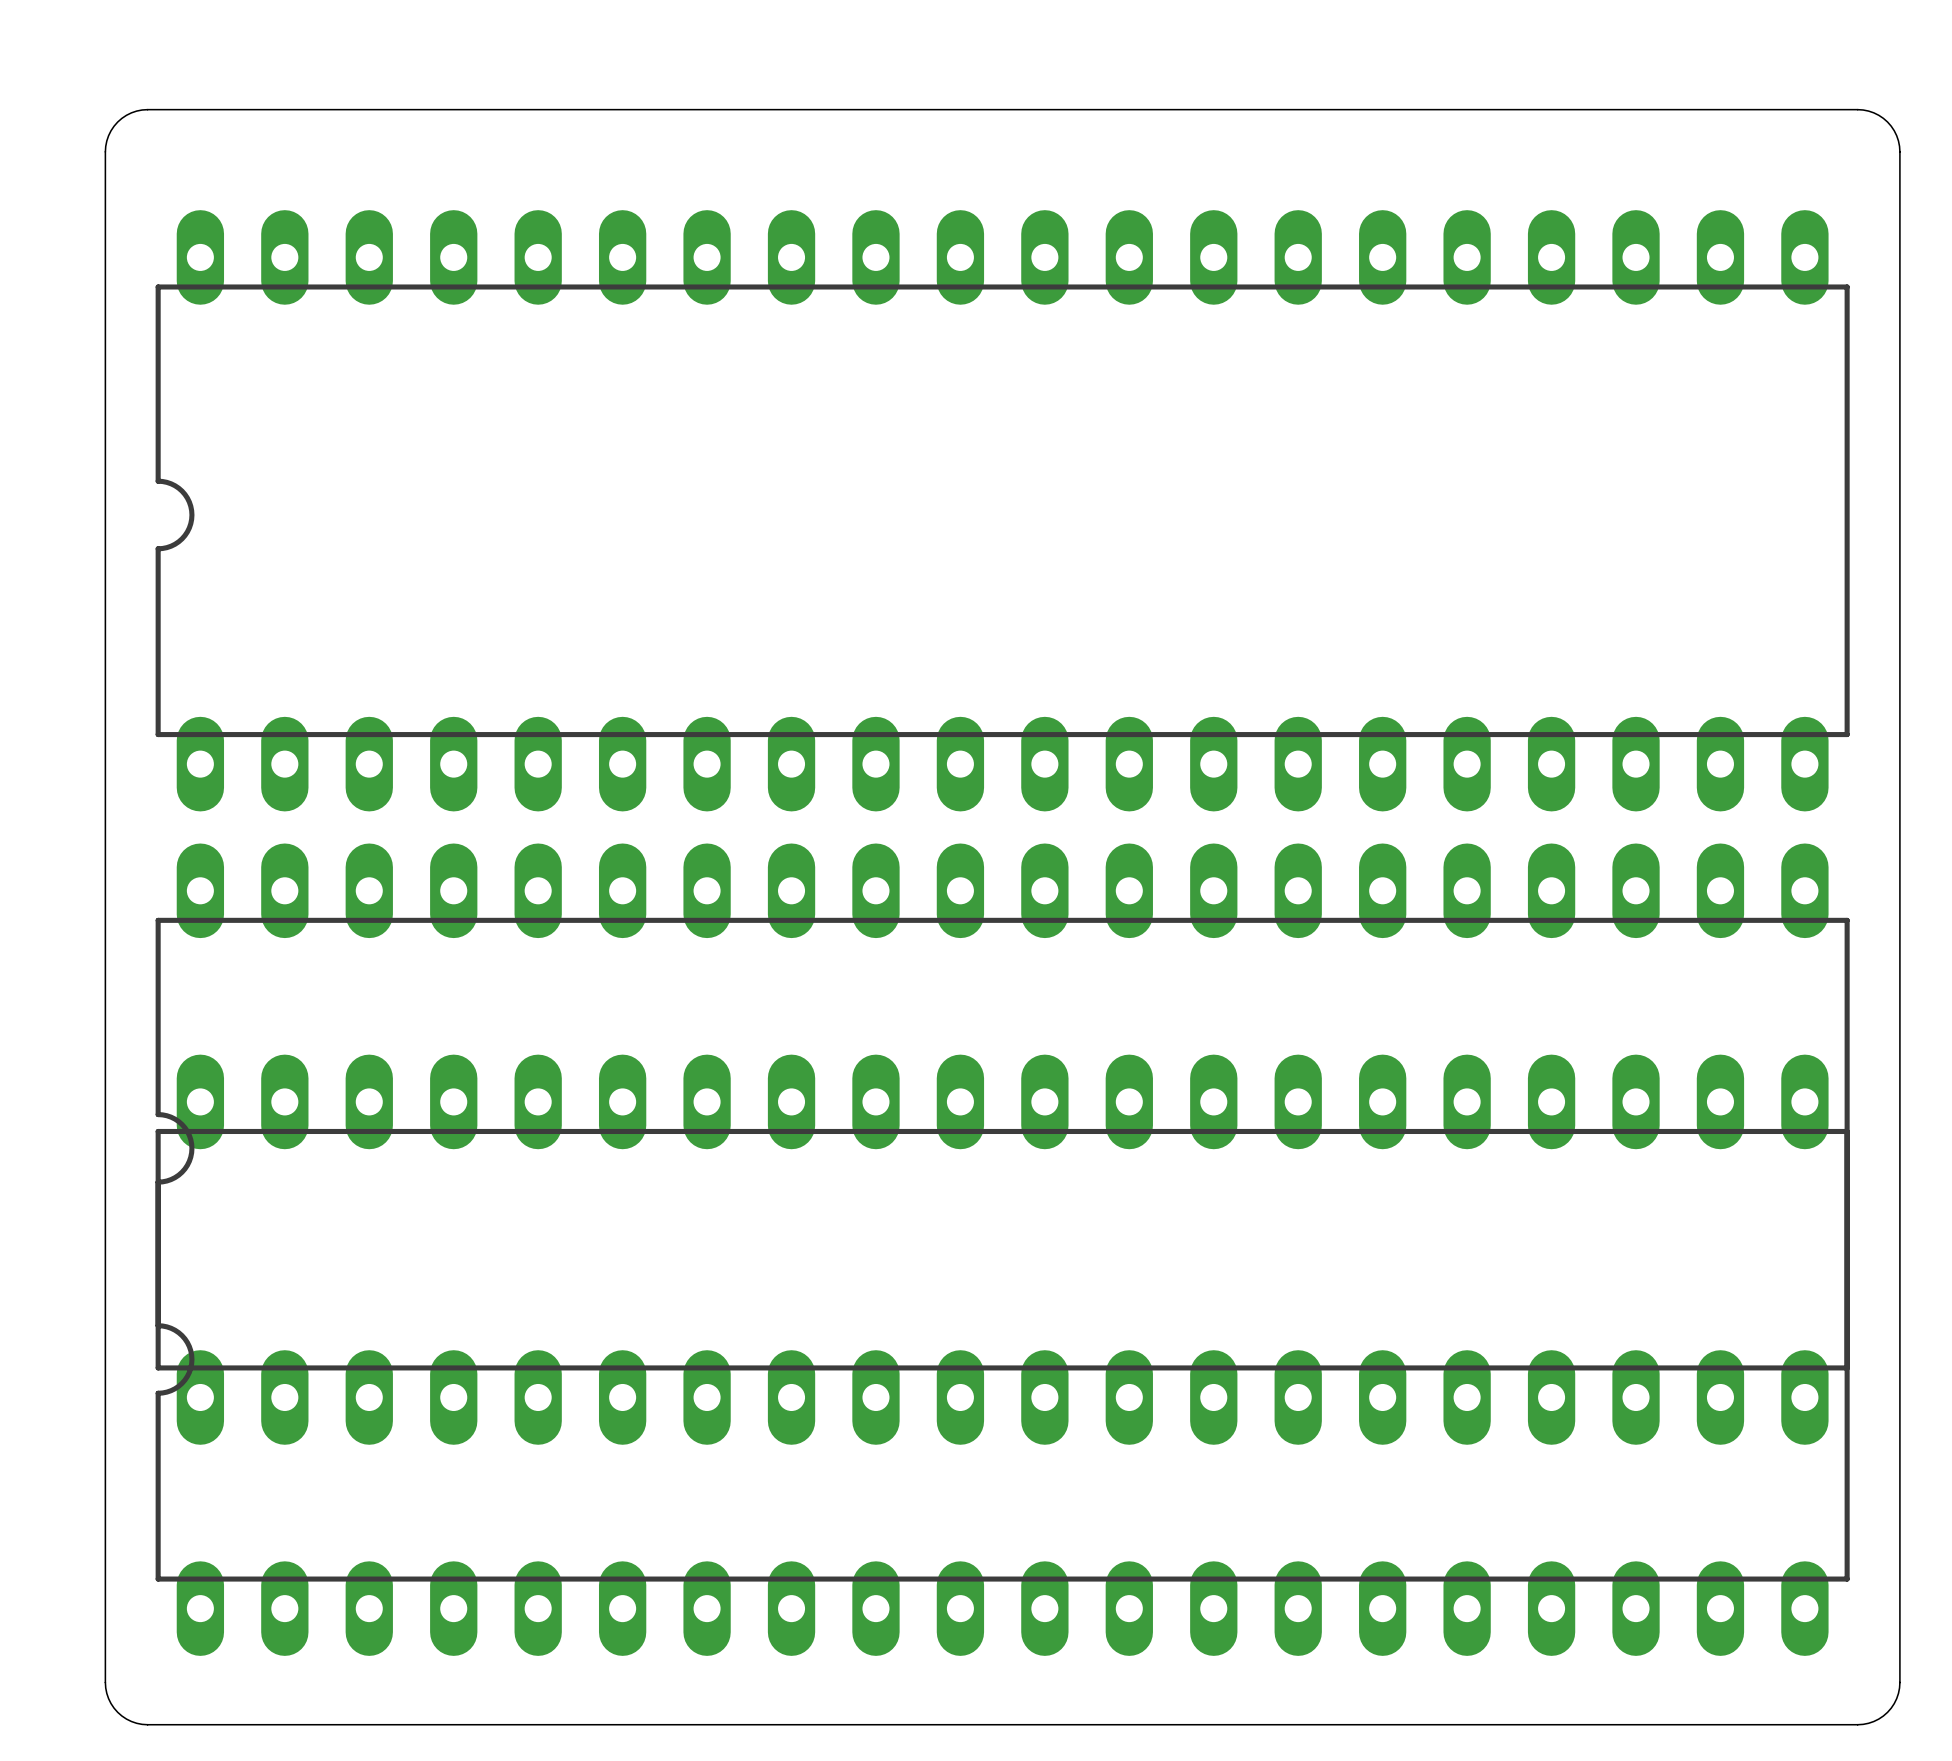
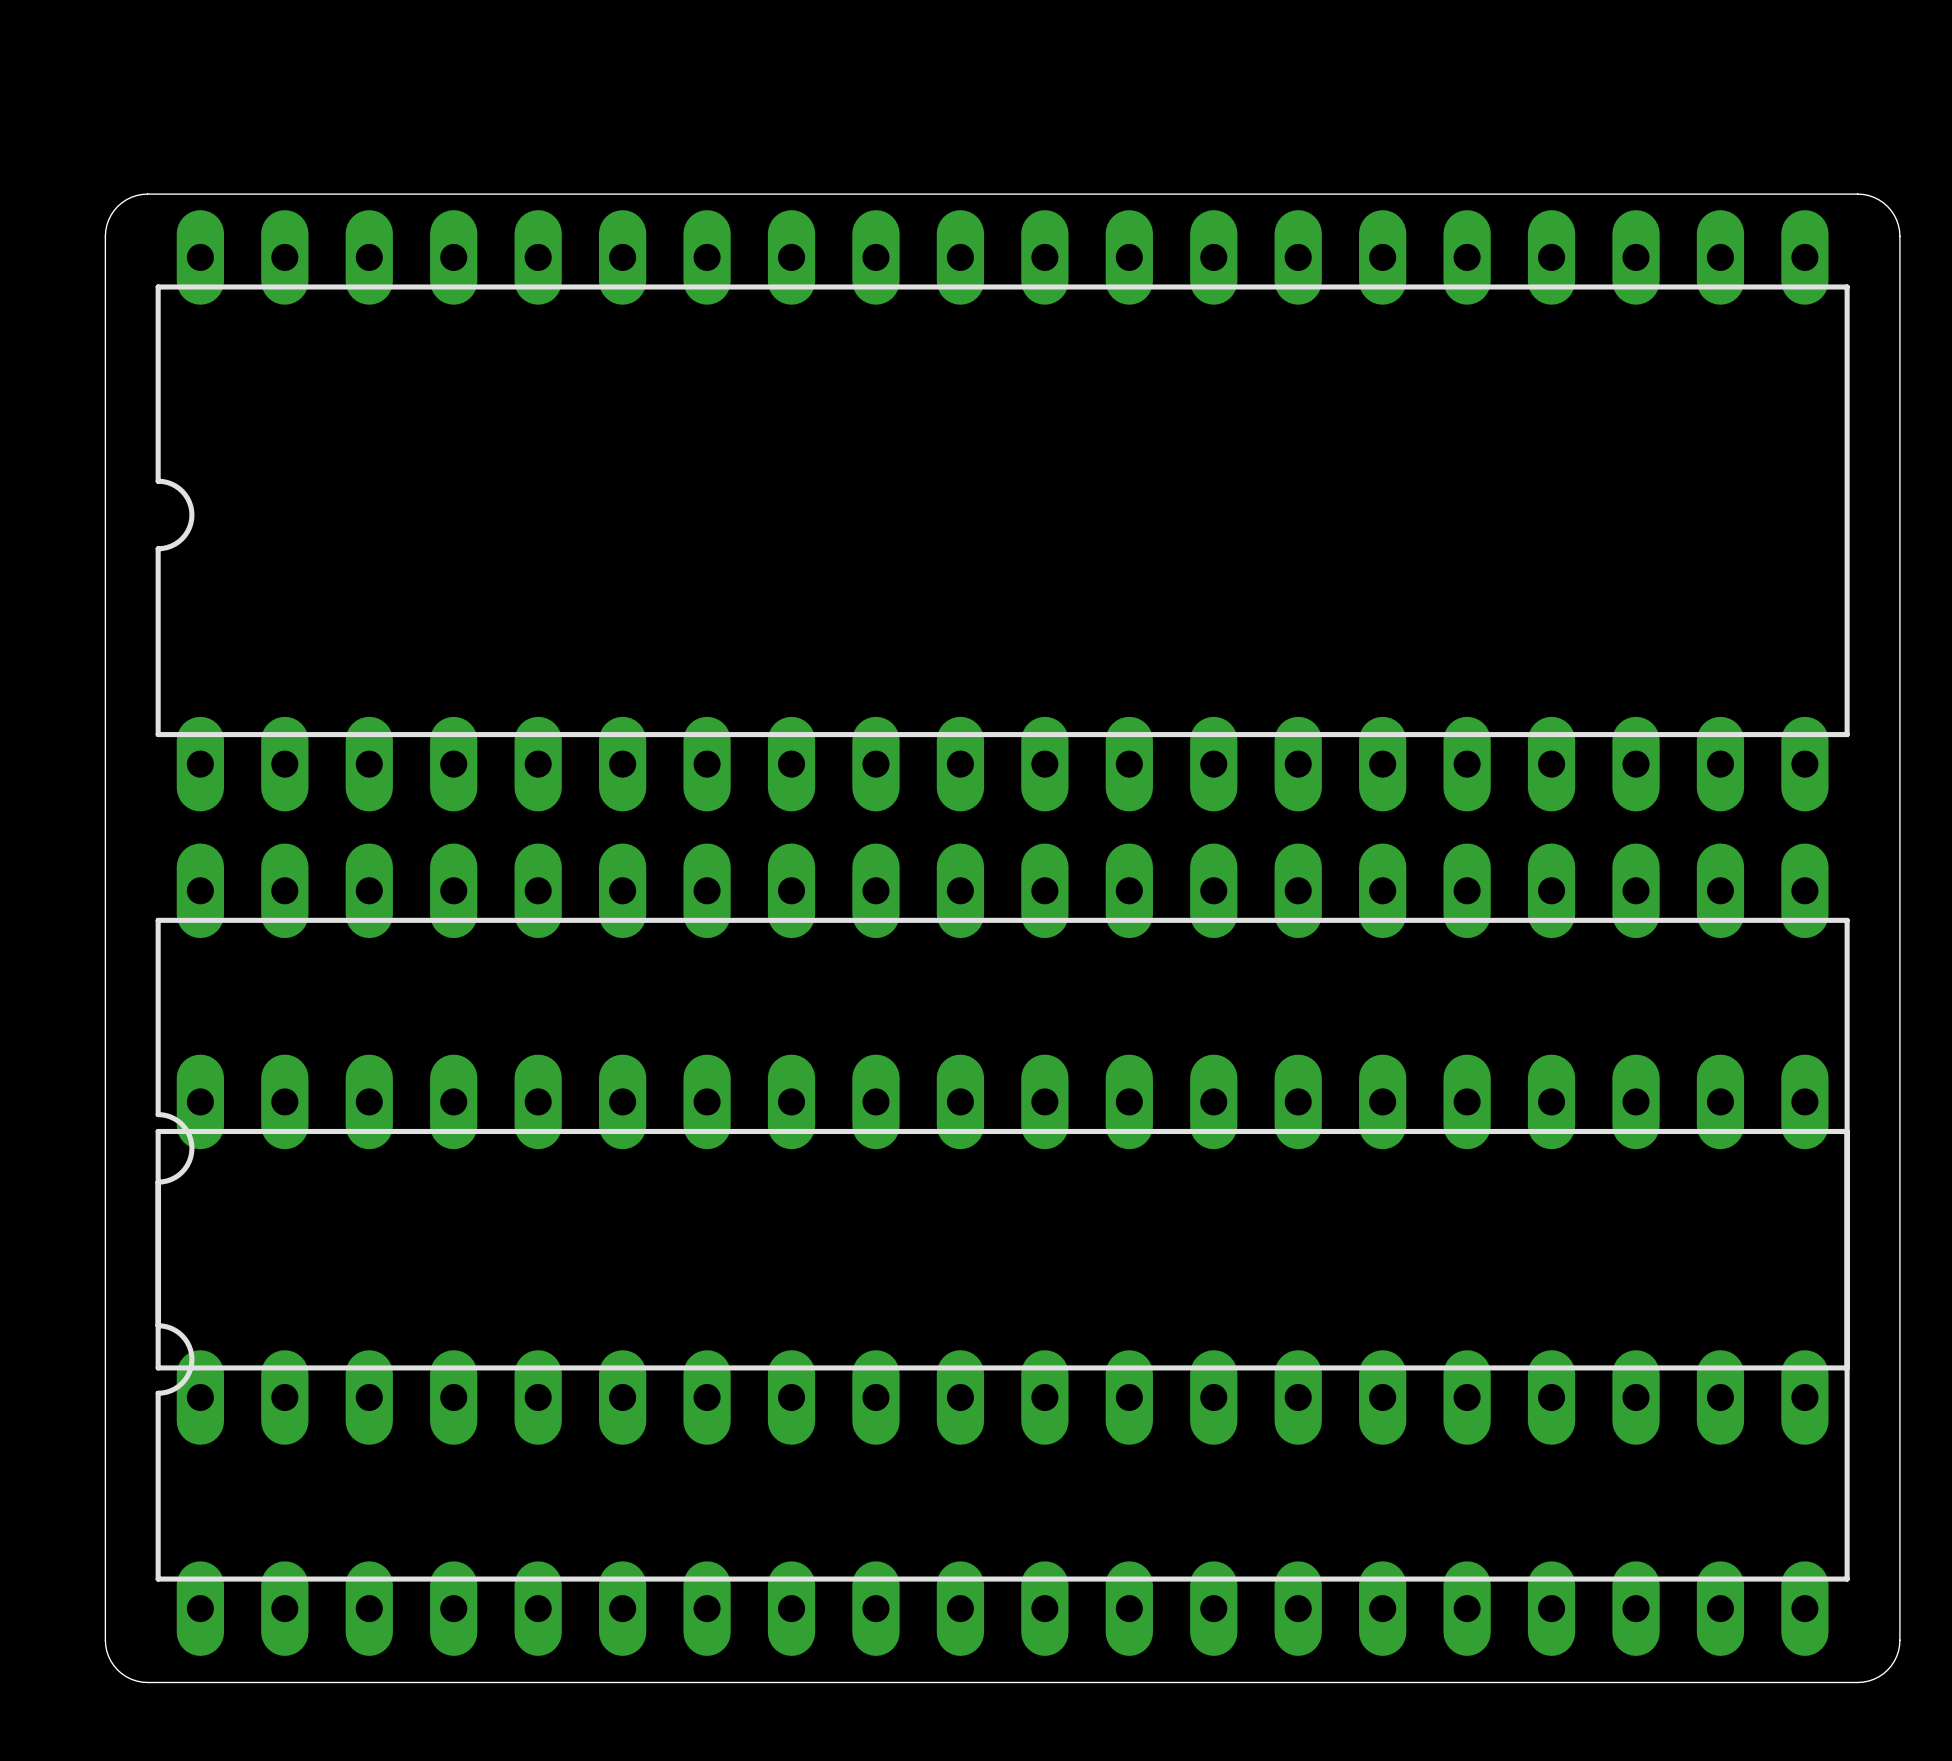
board edge: (105, 236) (106, 140) (111, 130) (121, 118) (136, 111) (147, 109) (1863, 110) (1883, 118) (1894, 130) (1898, 140) (1899, 236) -> (105, 236) (108, 220) (117, 206) (131, 197) (147, 194) (1857, 194) (1873, 197) (1887, 206) (1896, 220) (1899, 236)
board edge: (105, 1640) (105, 1688) (111, 1703) (126, 1719) (147, 1724) (1857, 1724) (1878, 1719) (1894, 1703) (1899, 1688) (1899, 1640) -> (105, 1640) (108, 1656) (117, 1670) (131, 1679) (147, 1682) (1857, 1682) (1873, 1679) (1887, 1670) (1896, 1656) (1899, 1640)

